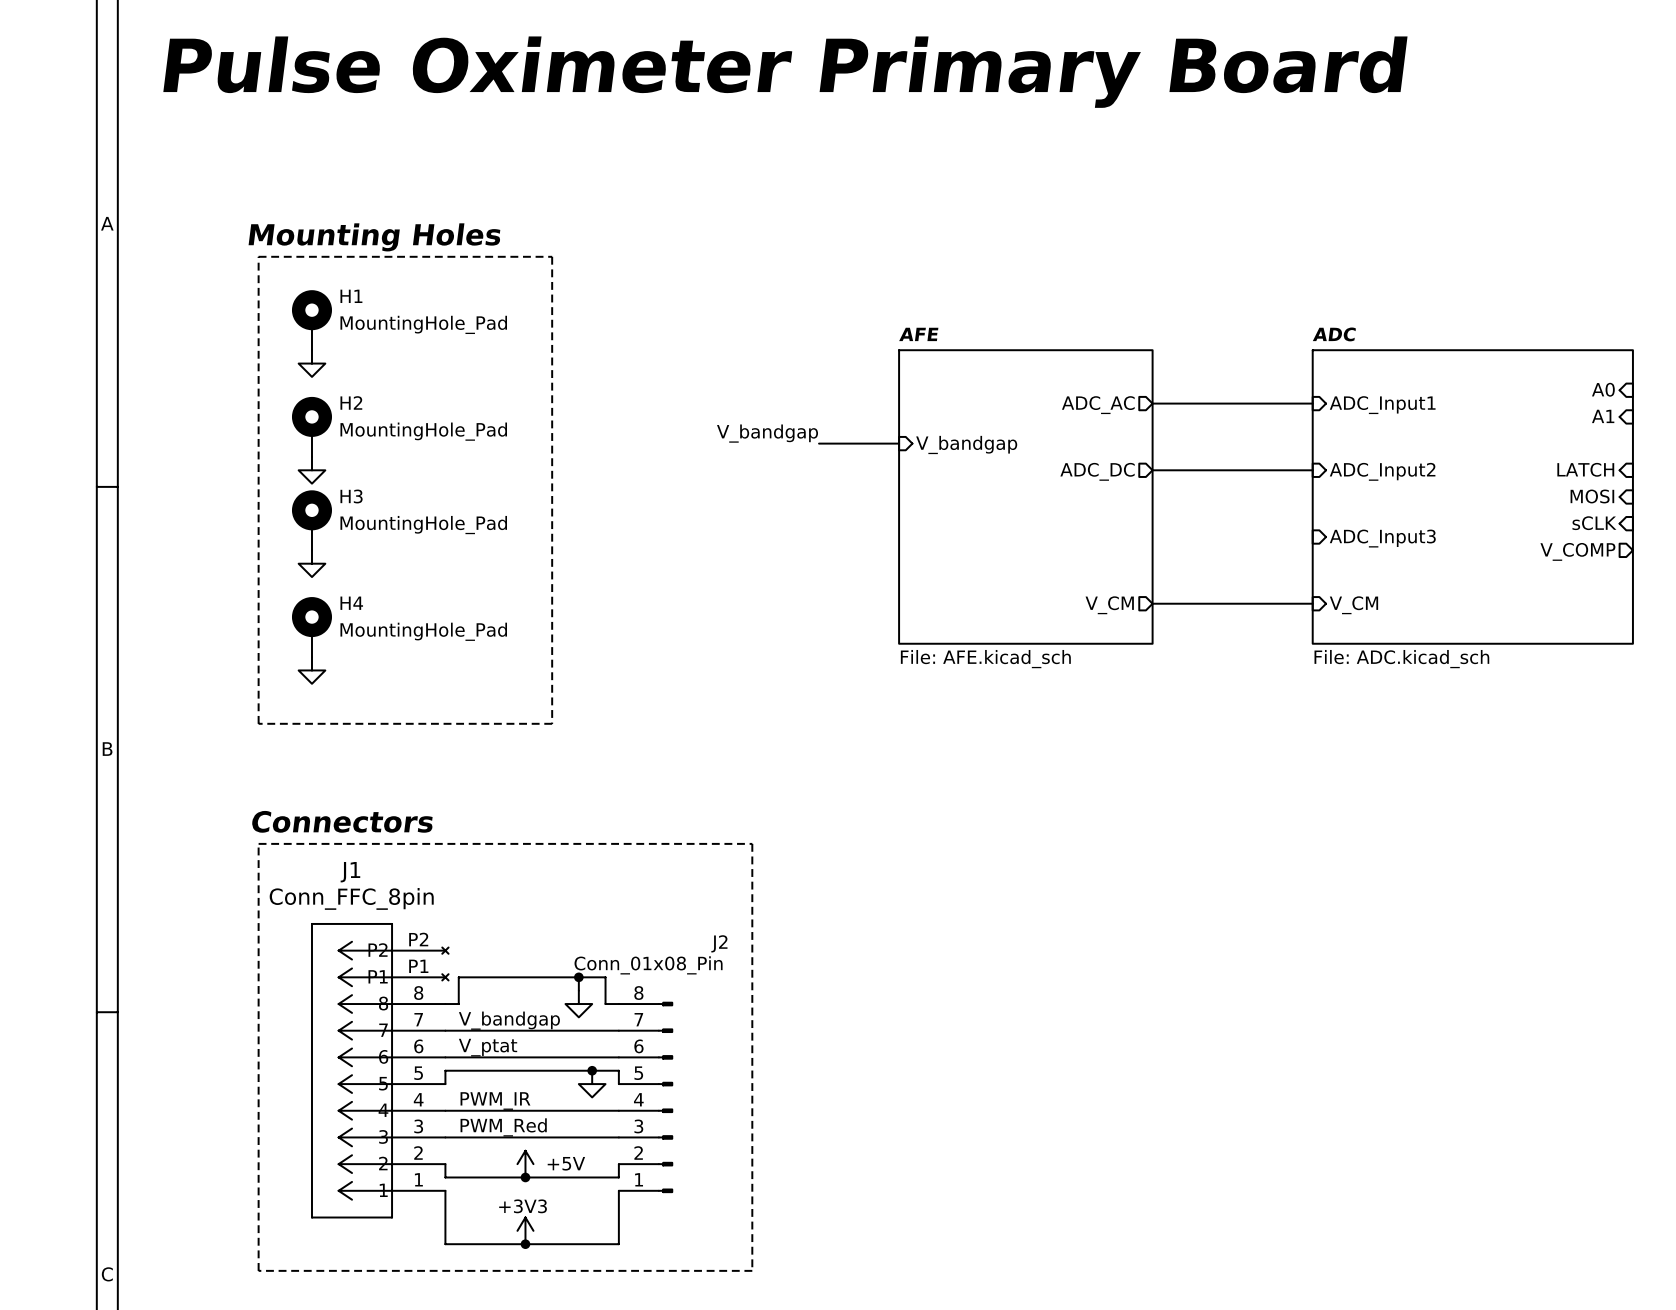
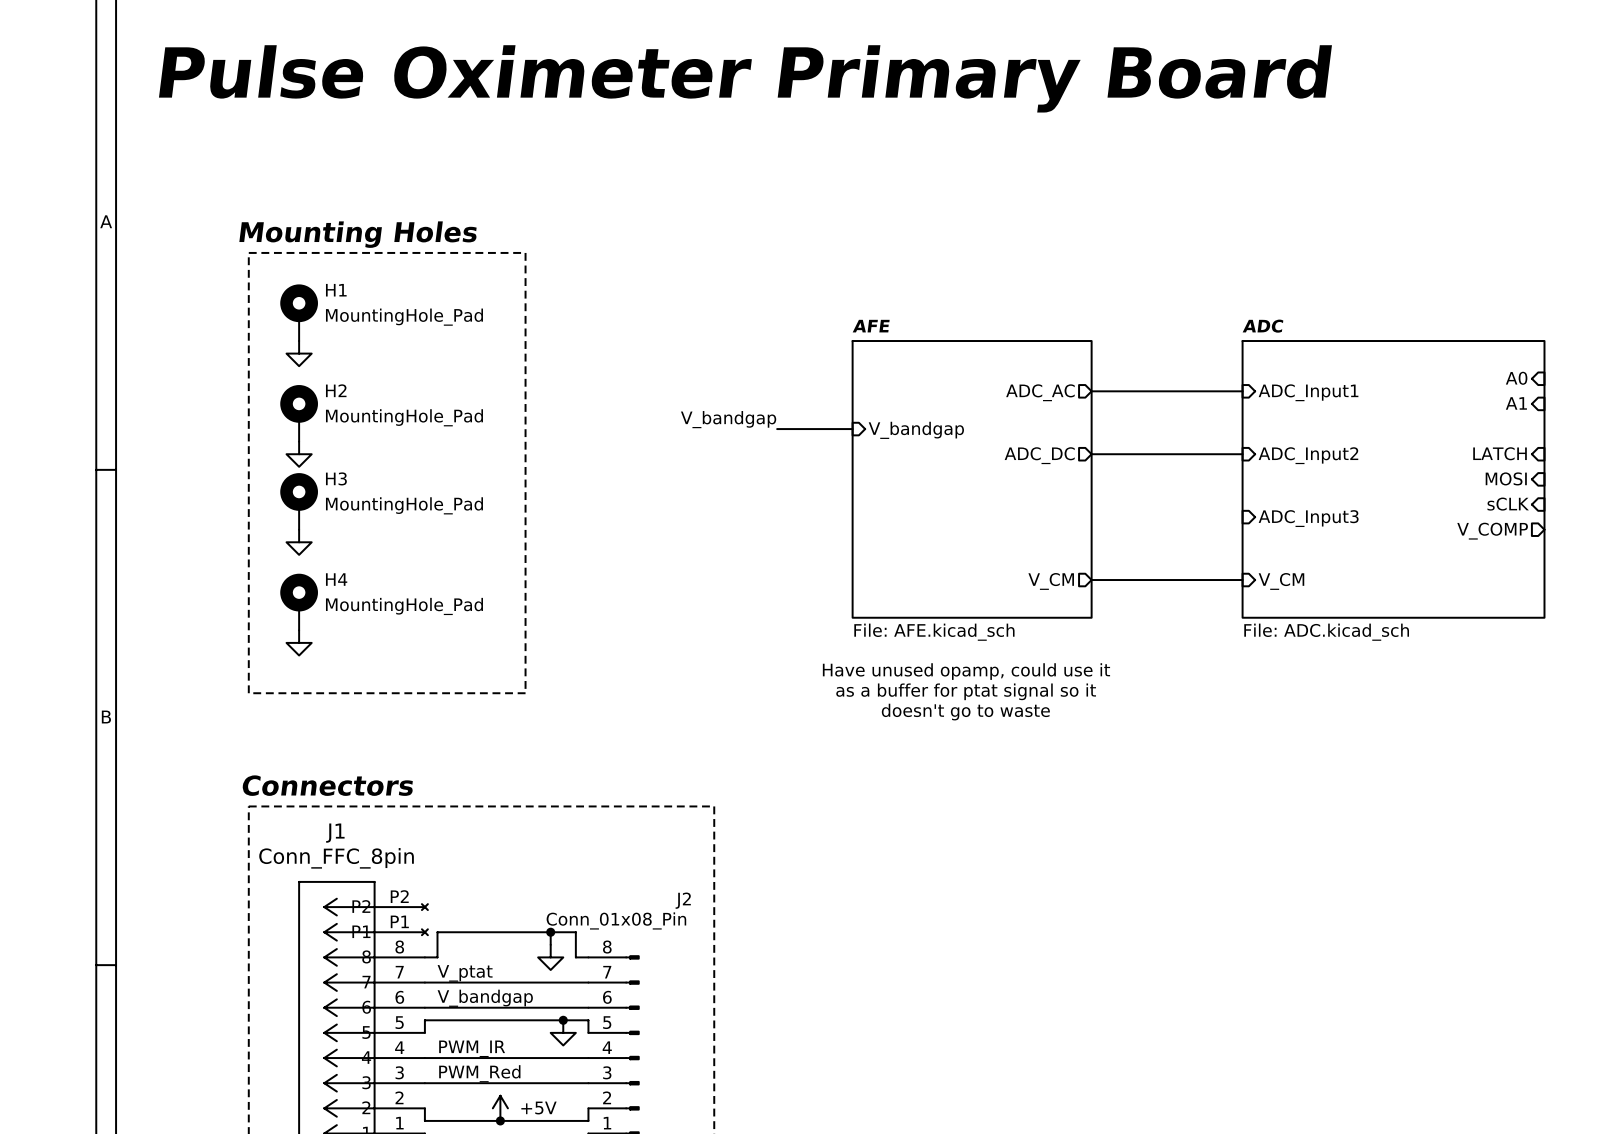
text: none -> Have unused opamp, could use it (966, 671)
text: none -> as a buffer for ptat signal so it (966, 691)
text: none -> doesn't go to waste (965, 712)
label: V_bandgap (509, 1020) -> V_ptat (465, 973)
label: V_ptat (488, 1047) -> V_bandgap (485, 998)

